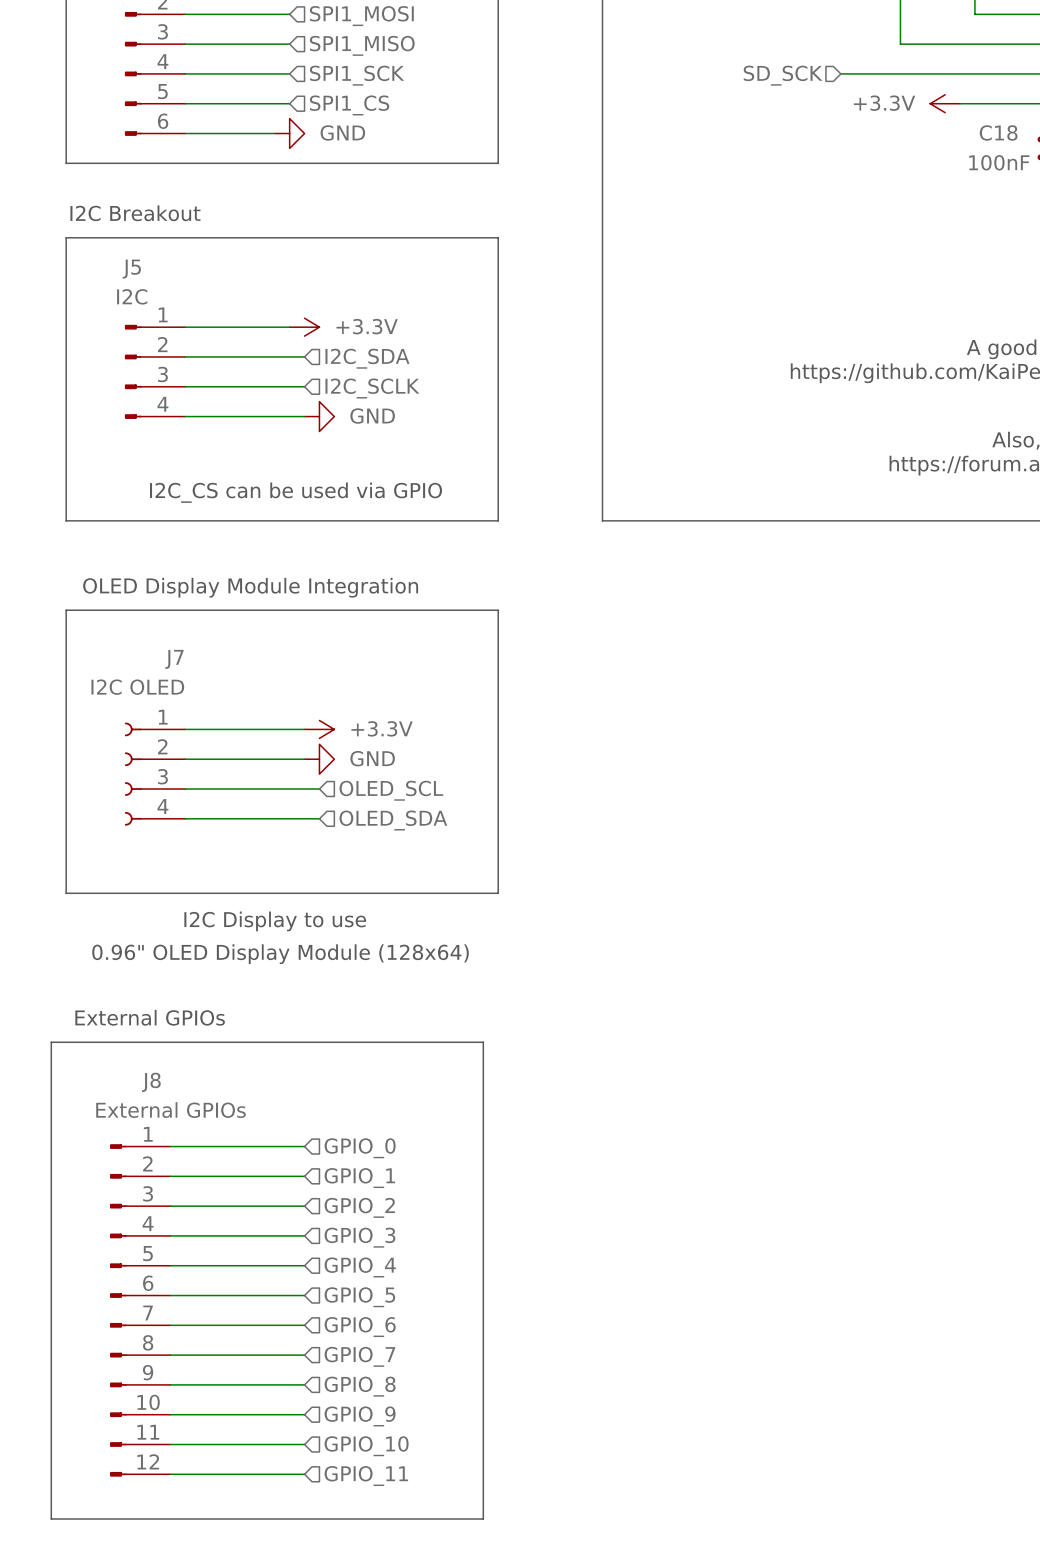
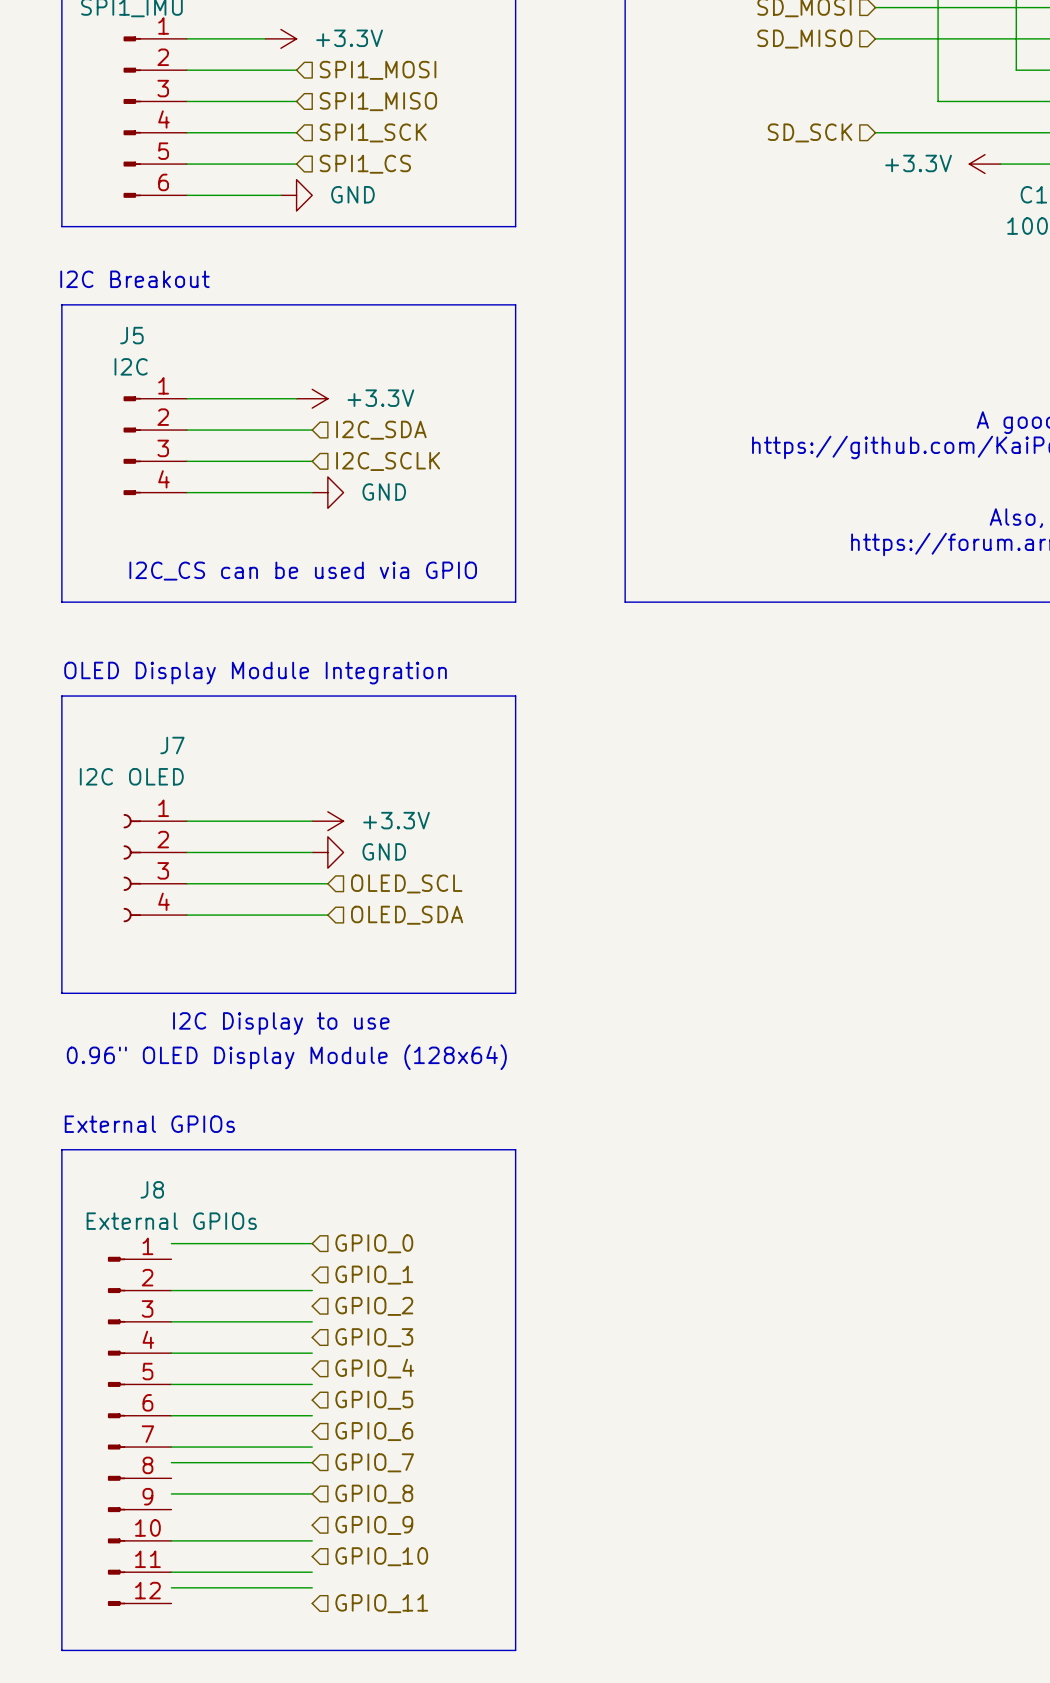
line: (66, 1042) (51, 1042) (51, 1518) (66, 1518) -> (61, 1149) (61, 1650)
line: (483, 1042) (483, 1518) -> (499, 1149) (515, 1149) (515, 1650) (499, 1650)
wire: (170, 1146) (304, 1146) -> (171, 1243) (312, 1243)
hierarchical label position: GPIO_0 (360, 1148) -> GPIO_0 (374, 1243)
hierarchical label position: GPIO_1 (359, 1178) -> GPIO_1 (374, 1275)
hierarchical label position: GPIO_2 (359, 1207) -> GPIO_2 (374, 1306)
hierarchical label position: GPIO_3 (359, 1237) -> GPIO_3 (374, 1337)
hierarchical label position: GPIO_4 (360, 1267) -> GPIO_4 (374, 1368)
hierarchical label position: GPIO_5 (359, 1297) -> GPIO_5 (374, 1400)
hierarchical label position: GPIO_6 (360, 1327) -> GPIO_6 (374, 1431)
wire: (170, 1355) (304, 1355) -> (171, 1462) (312, 1462)
hierarchical label position: GPIO_7 (359, 1356) -> GPIO_7 (374, 1462)
wire: (170, 1384) (304, 1384) -> (171, 1493) (312, 1493)
hierarchical label position: GPIO_8 (360, 1386) -> GPIO_8 (374, 1494)
hierarchical label position: GPIO_9 (360, 1416) -> GPIO_9 (374, 1525)
hierarchical label position: GPIO_10 (366, 1446) -> GPIO_10 (381, 1556)
wire: (170, 1474) (304, 1474) -> (171, 1587) (312, 1587)

